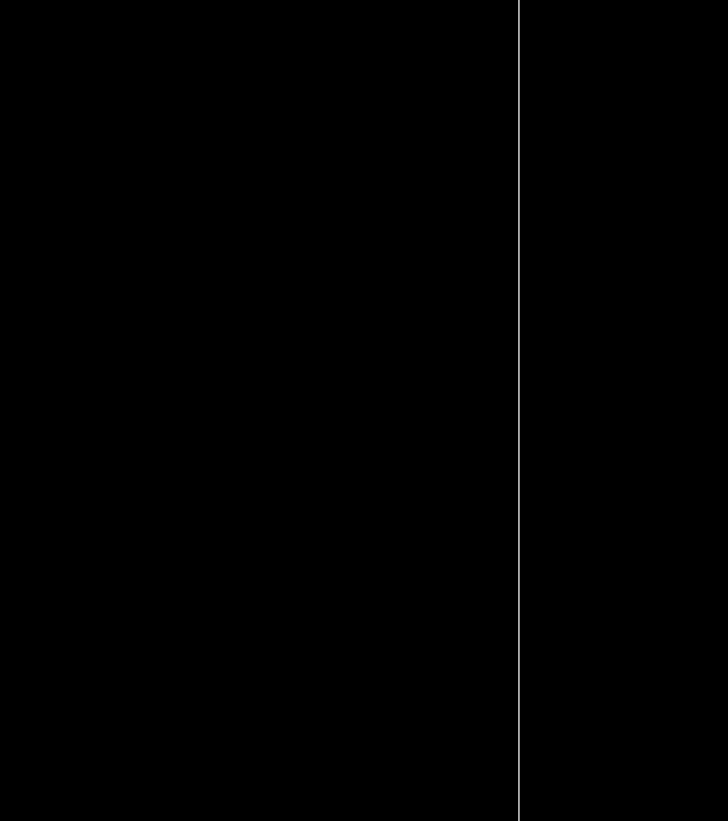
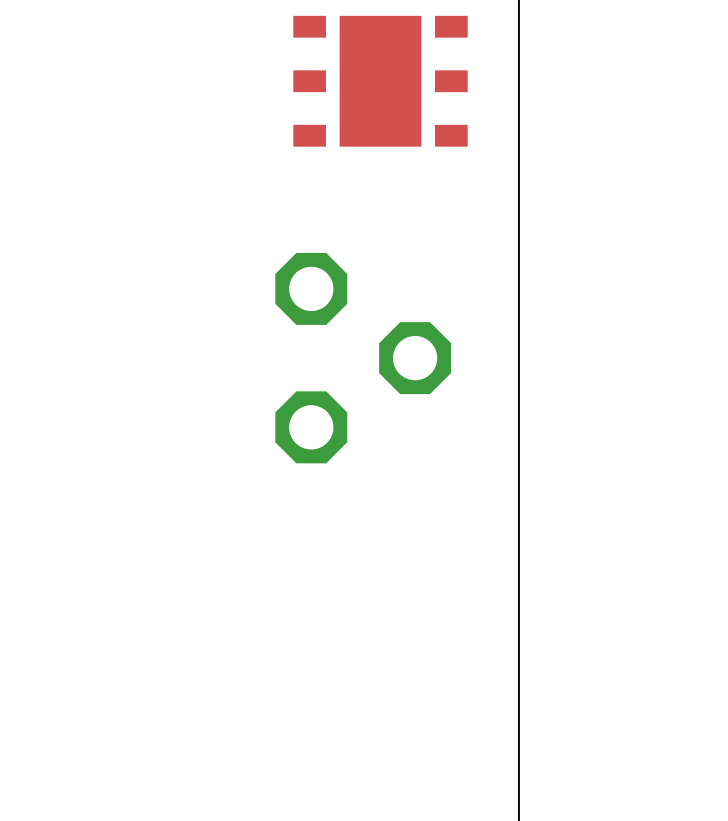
part: none -> (380, 81)
part: none -> (363, 358)

